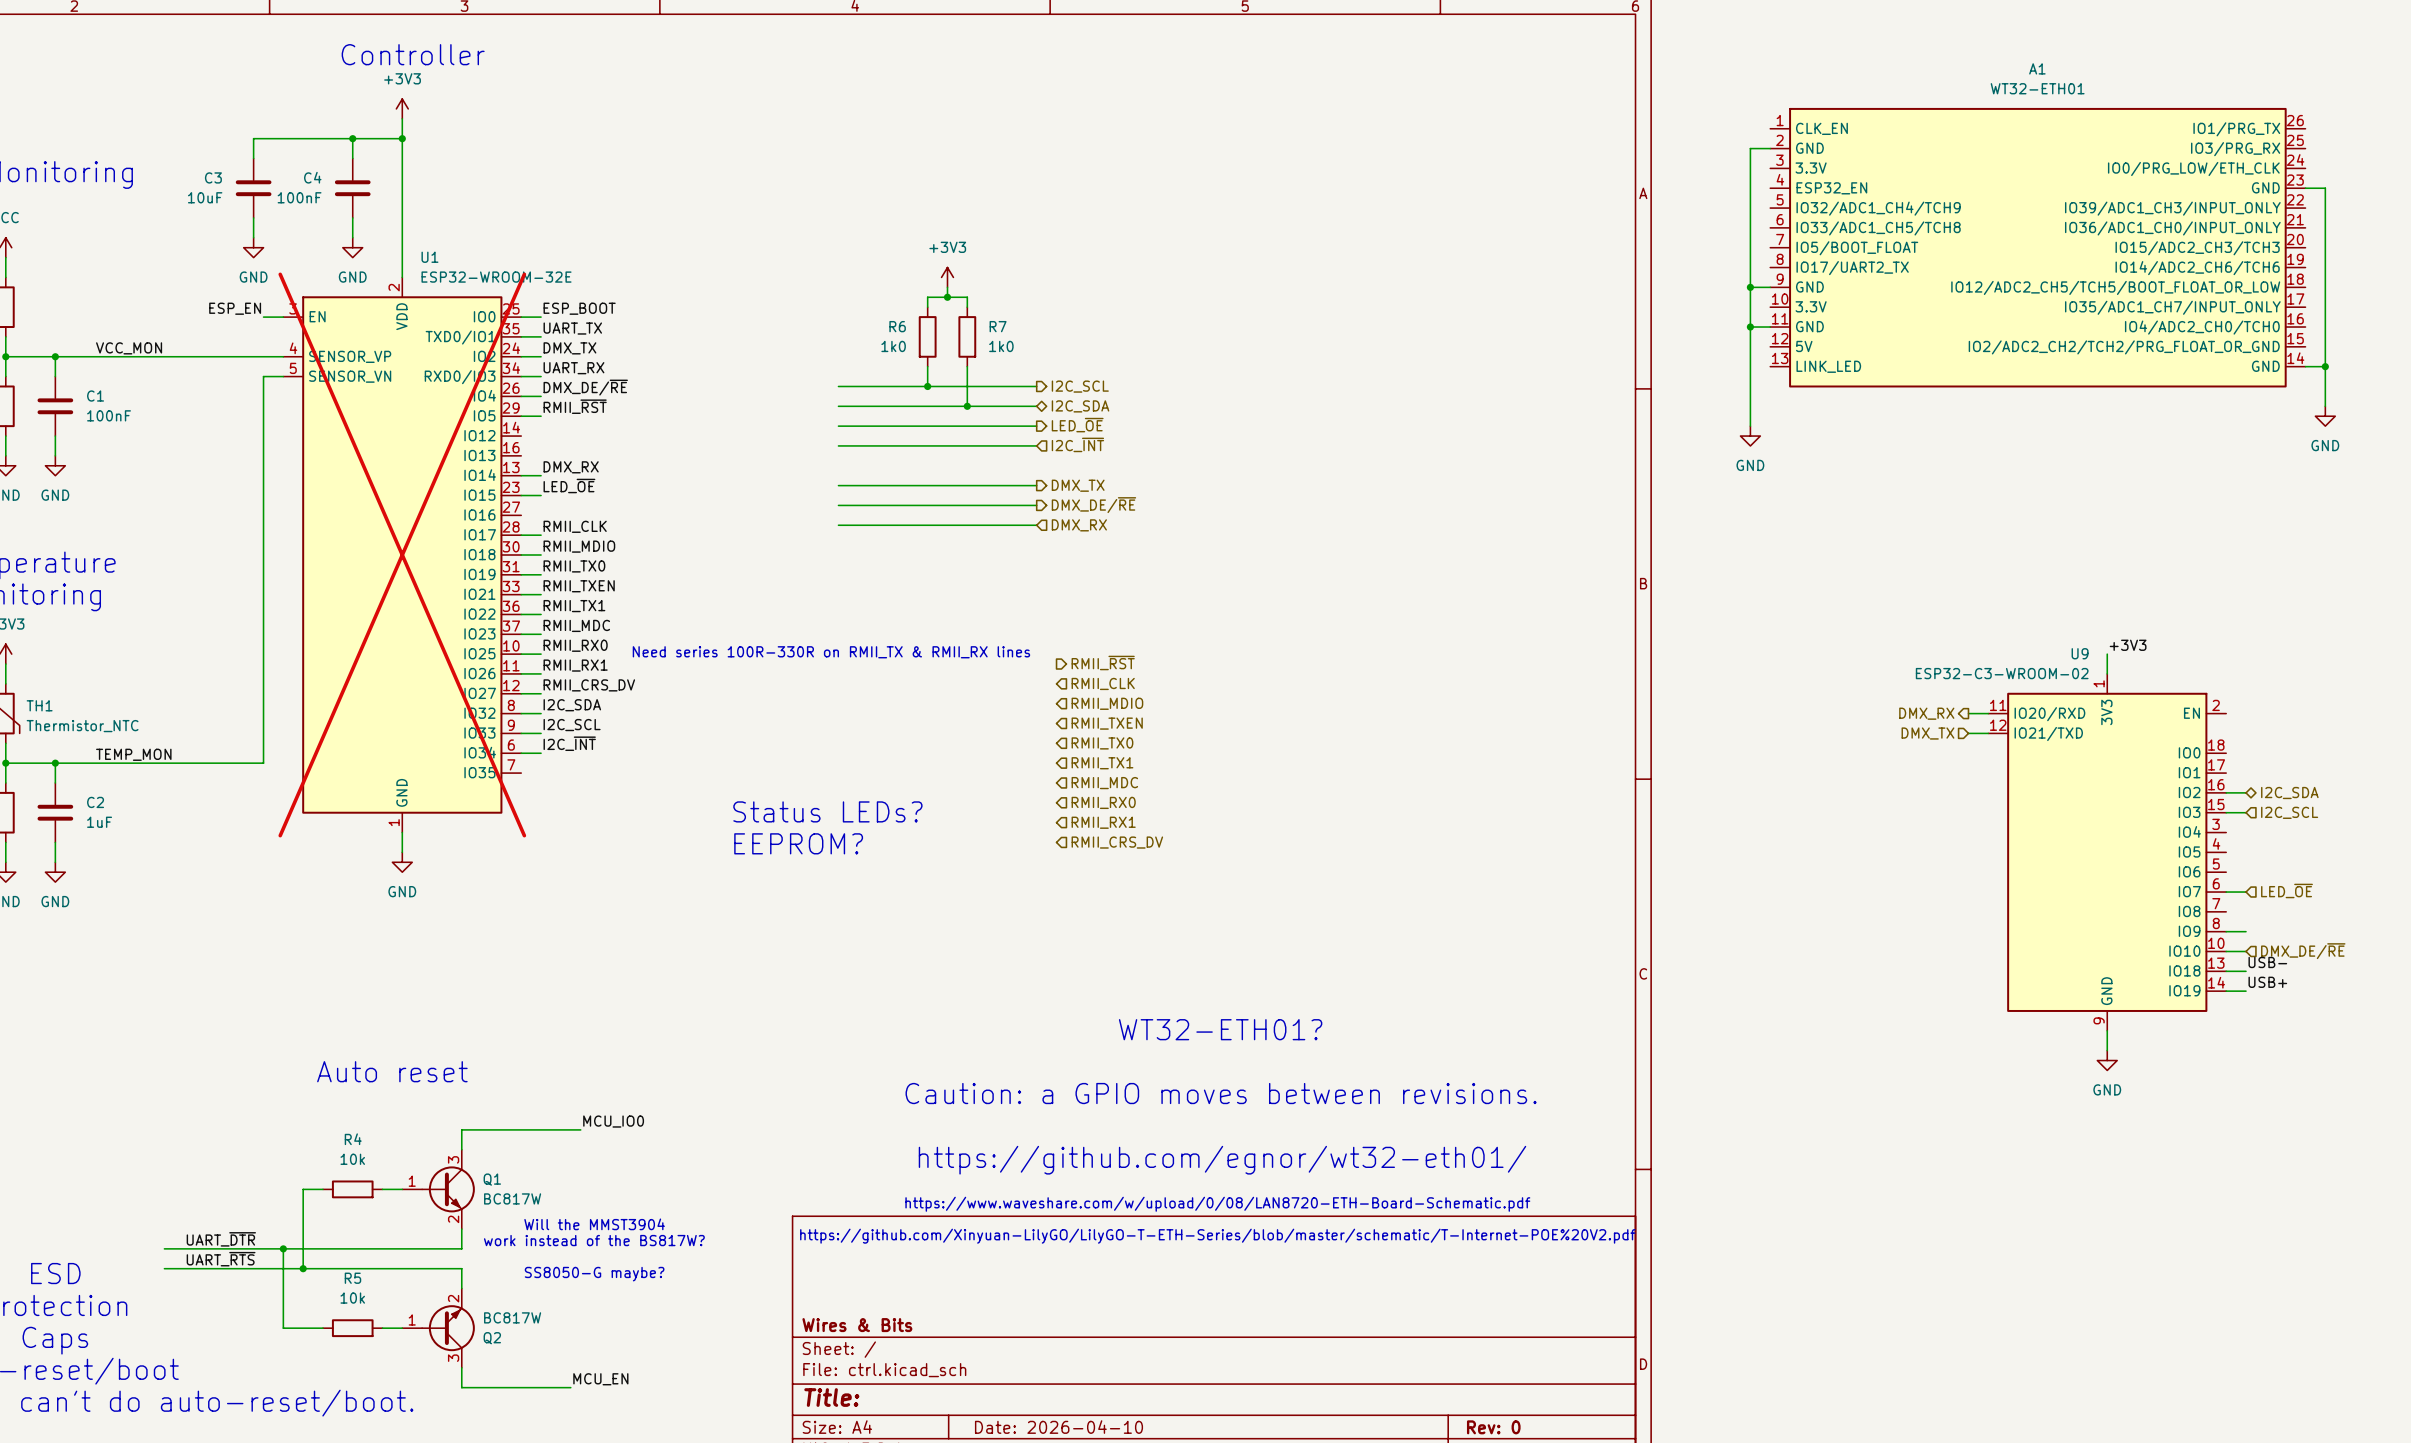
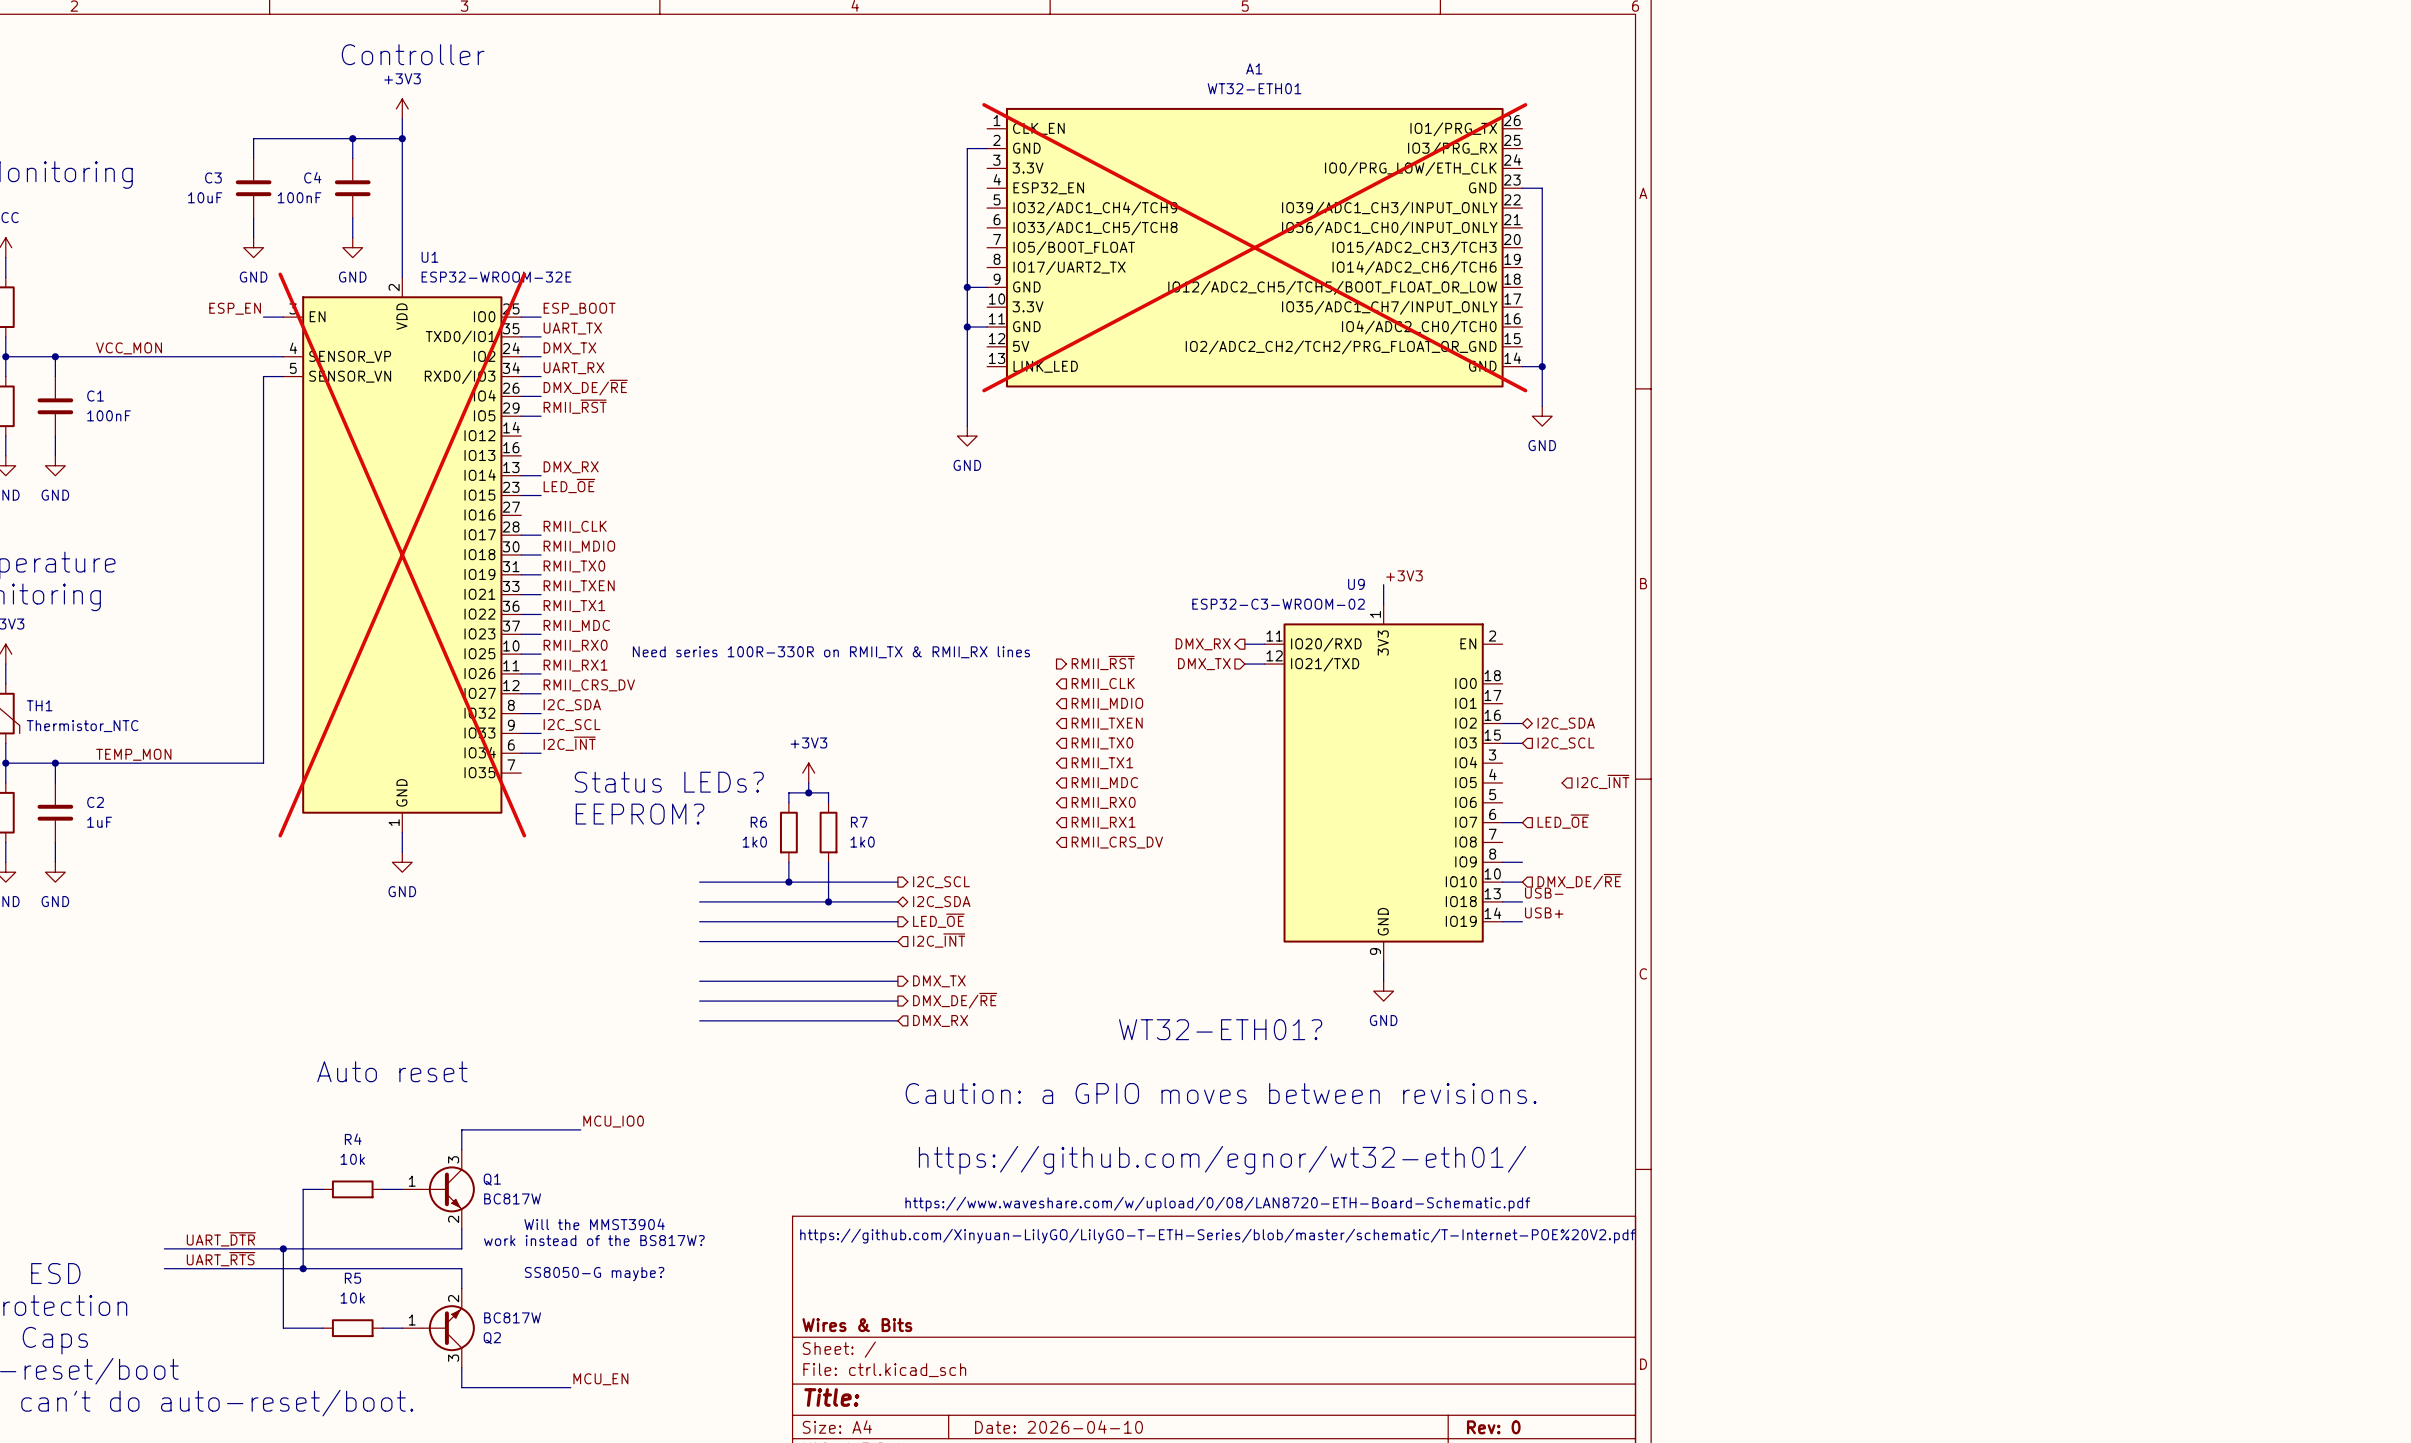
wire: (1770, 148) (1750, 148) (1750, 426) -> none
wire: none -> (1522, 188) (1542, 188) (1542, 406)
wire: (2305, 188) (2325, 188) (2325, 406) -> none
A1 do-not-place cross: none -> (1254, 247)
A1 position: (2037, 247) -> (1254, 247)
power symbol: +3V3 (947, 277) -> none
wire: (947, 287) (947, 297) -> none
wire: none -> (967, 287) (987, 287)
junction: none -> (967, 287)
wire: (1750, 287) (1770, 287) -> none
junction: (1750, 287) -> none
junction: (947, 297) -> none
wire: (967, 297) (927, 297) (927, 307) -> (967, 297) (967, 148) (987, 148)
wire: none -> (967, 307) (967, 366)
wire: none -> (967, 327) (987, 327)
junction: none -> (967, 327)
wire: (1750, 327) (1770, 327) -> none
junction: (1750, 327) -> none
R6 position: (927, 336) -> (788, 832)
R7 position: (967, 336) -> (828, 832)
wire: (927, 366) (927, 386) -> (967, 406) (967, 426)
wire: none -> (1522, 366) (1542, 366)
junction: none -> (1542, 366)
wire: (2305, 366) (2325, 366) -> none
junction: (2325, 366) -> none
wire: (838, 386) (1036, 386) -> none
junction: (927, 386) -> none
hierarchical label: I2C_SCL (1080, 386) -> none
wire: (838, 406) (1036, 406) -> none
junction: (967, 406) -> none
hierarchical label: I2C_SDA (1080, 406) -> none
power symbol: none -> GND (1542, 416)
power symbol: GND (2325, 416) -> none
hierarchical label: LED_~{OE} (1077, 425) -> none
wire: (838, 426) (1036, 426) -> none
power symbol: none -> GND (967, 436)
power symbol: GND (1750, 436) -> none
hierarchical label: I2C_~{INT} (1077, 444) -> none
wire: (838, 445) (1036, 445) -> none
wire: (838, 485) (1036, 485) -> none
hierarchical label: DMX_TX (1078, 485) -> none
wire: (838, 505) (1036, 505) -> none
hierarchical label: DMX_DE/~{RE} (1093, 505) -> none
wire: (838, 525) (1036, 525) -> none
hierarchical label: DMX_RX (1079, 525) -> none
label: none -> +3V3 (1404, 575)
wire: none -> (1383, 584) (1383, 604)
hierarchical label: none -> DMX_RX (1203, 644)
wire: none -> (1244, 644) (1264, 644)
label: +3V3 (2128, 645) -> none
wire: (2107, 654) (2107, 673) -> none
hierarchical label: none -> DMX_TX (1204, 664)
wire: none -> (1244, 664) (1264, 664)
hierarchical label: DMX_RX (1926, 713) -> none
wire: (1968, 713) (1988, 713) -> none
wire: none -> (1502, 723) (1522, 723)
hierarchical label: none -> I2C_SDA (1566, 723)
hierarchical label: DMX_TX (1927, 733) -> none
wire: (1968, 733) (1988, 733) -> none
wire: none -> (1502, 743) (1522, 743)
hierarchical label: none -> I2C_SCL (1566, 743)
power symbol: none -> +3V3 (808, 773)
hierarchical label: none -> I2C_~{INT} (1603, 781)
wire: none -> (808, 782) (808, 792)
junction: none -> (808, 792)
wire: (2226, 792) (2246, 792) -> none
hierarchical label: I2C_SDA (2289, 793) -> none
wire: none -> (788, 802) (788, 792) (828, 792) (828, 802)
text position: Status LEDs? (827, 811) -> Status LEDs? (669, 782)
wire: (2226, 812) (2246, 812) -> none
hierarchical label: I2C_SCL (2289, 812) -> none
hierarchical label: none -> LED_~{OE} (1563, 821)
wire: none -> (1502, 822) (1522, 822)
text position: EEPROM? (798, 843) -> EEPROM? (640, 814)
U9 position: (2107, 852) -> (1383, 782)
wire: none -> (788, 862) (788, 882)
wire: none -> (828, 862) (828, 901)
wire: none -> (1502, 862) (1522, 862)
hierarchical label: none -> DMX_DE/~{RE} (1579, 881)
wire: none -> (699, 882) (897, 882)
junction: none -> (788, 882)
hierarchical label: none -> I2C_SCL (941, 882)
wire: none -> (1502, 882) (1522, 882)
hierarchical label: LED_~{OE} (2286, 890) -> none
wire: (2226, 892) (2246, 892) -> none
label: none -> USB- (1544, 893)
wire: none -> (699, 901) (897, 901)
junction: none -> (828, 901)
wire: none -> (1502, 901) (1522, 901)
hierarchical label: none -> I2C_SDA (941, 902)
label: none -> USB+ (1544, 912)
hierarchical label: none -> LED_~{OE} (938, 920)
wire: none -> (699, 921) (897, 921)
wire: none -> (1502, 921) (1522, 921)
wire: (2226, 931) (2246, 931) -> none
hierarchical label: none -> I2C_~{INT} (939, 940)
wire: none -> (699, 941) (897, 941)
wire: (2226, 951) (2246, 951) -> none
hierarchical label: DMX_DE/~{RE} (2303, 951) -> none
wire: none -> (1383, 961) (1383, 981)
label: USB- (2267, 962) -> none
wire: (2226, 971) (2246, 971) -> none
wire: none -> (699, 981) (897, 981)
hierarchical label: none -> DMX_TX (939, 981)
label: USB+ (2267, 982) -> none
power symbol: none -> GND (1383, 991)
wire: (2226, 991) (2246, 991) -> none
hierarchical label: none -> DMX_DE/~{RE} (955, 1000)
wire: none -> (699, 1001) (897, 1001)
wire: none -> (699, 1020) (897, 1020)
hierarchical label: none -> DMX_RX (940, 1020)
wire: (2107, 1030) (2107, 1050) -> none
power symbol: GND (2107, 1060) -> none

